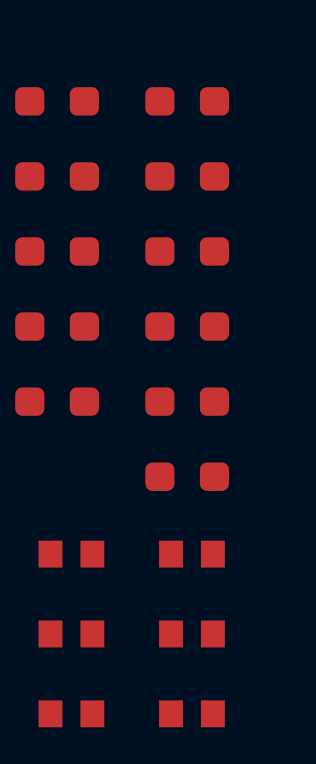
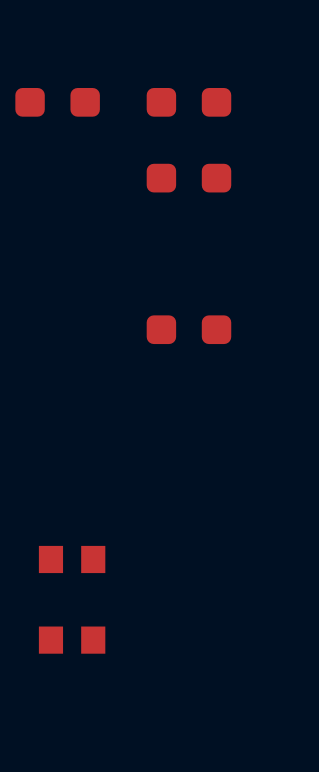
part: (57, 176) -> none
part: (57, 251) -> none
part: (187, 251) -> none
part: (57, 326) -> none
part: (57, 401) -> none
part: (187, 401) -> none
part: (187, 476) -> none
part: (191, 554) -> none
part: (191, 633) -> none
part: (71, 713) -> none
part: (191, 713) -> none

